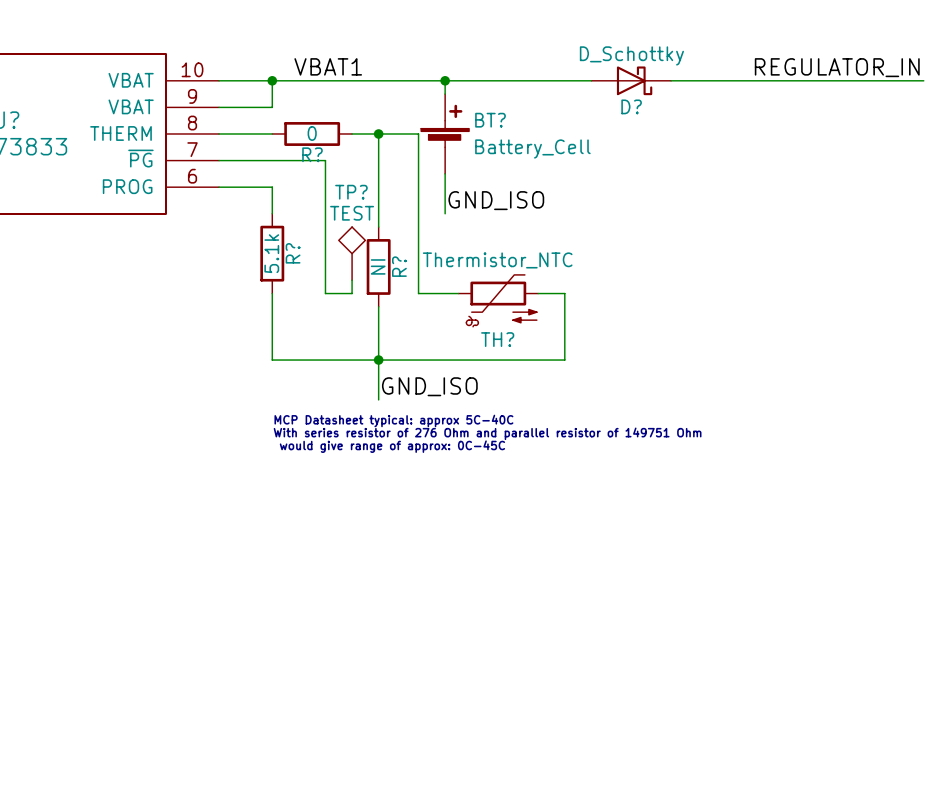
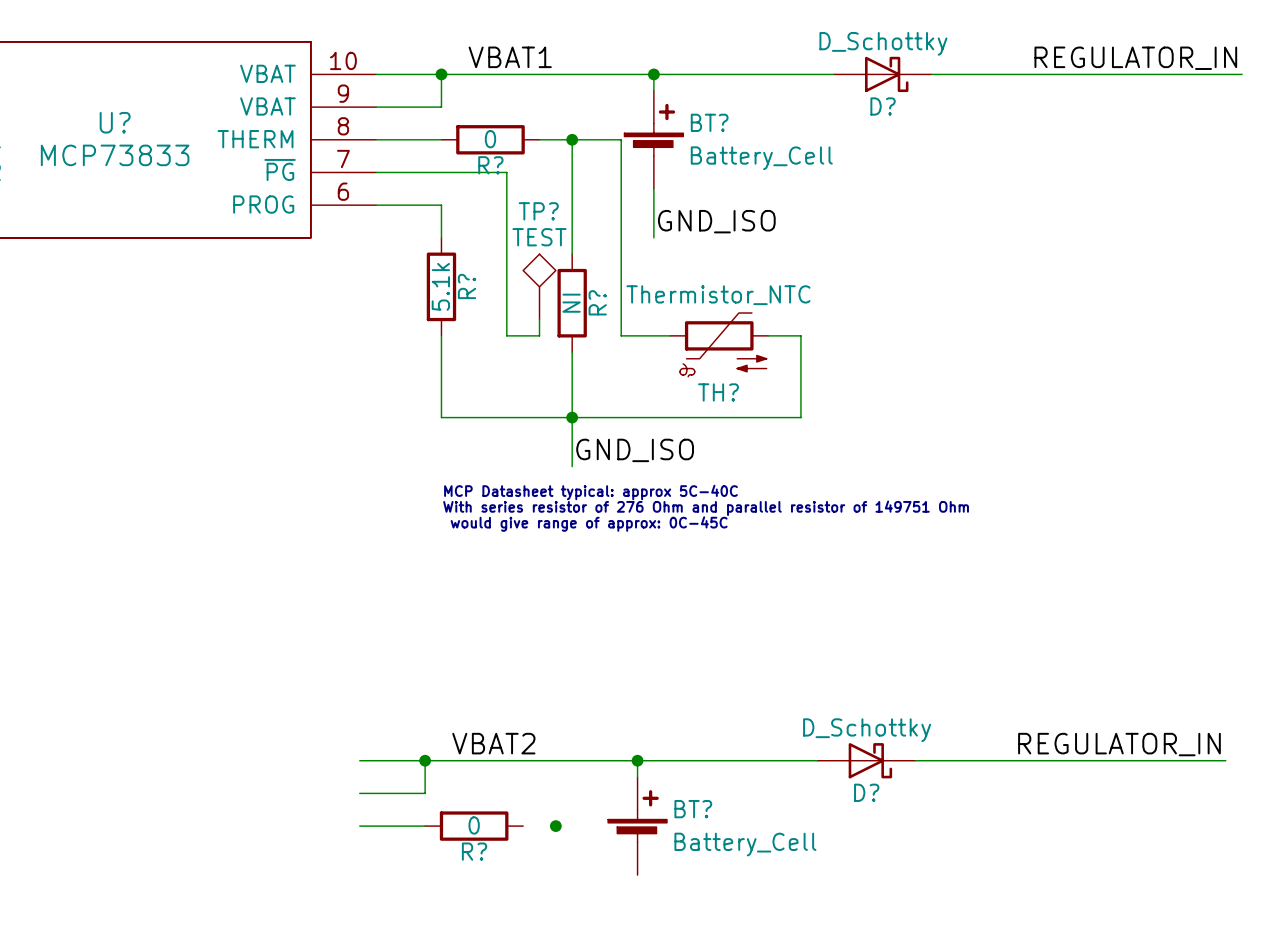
label: none -> VBAT2 (493, 743)
label: none -> REGULATOR_IN (1119, 744)
wire: none -> (359, 760) (817, 760)
wire: none -> (425, 760) (425, 793) (359, 793)
junction: none -> (425, 760)
wire: none -> (637, 760) (637, 777)
junction: none -> (637, 760)
D?: none -> D_Schottky (866, 760)
wire: none -> (915, 760) (1225, 760)
wire: none -> (359, 826) (425, 826)
R?: none -> 0 (474, 826)
junction: none -> (555, 826)
BT?: none -> Battery_Cell (637, 826)

